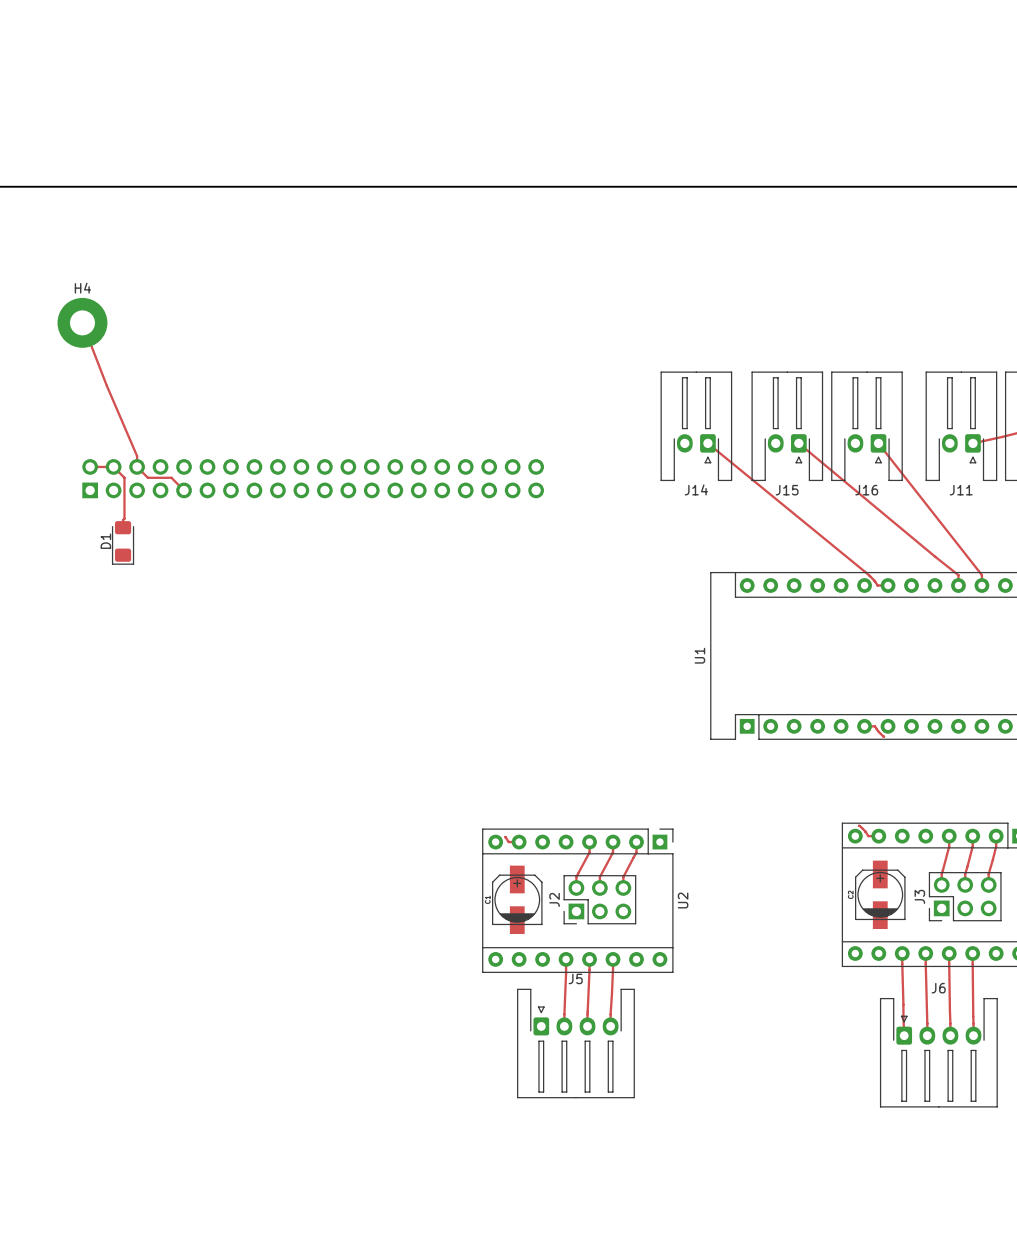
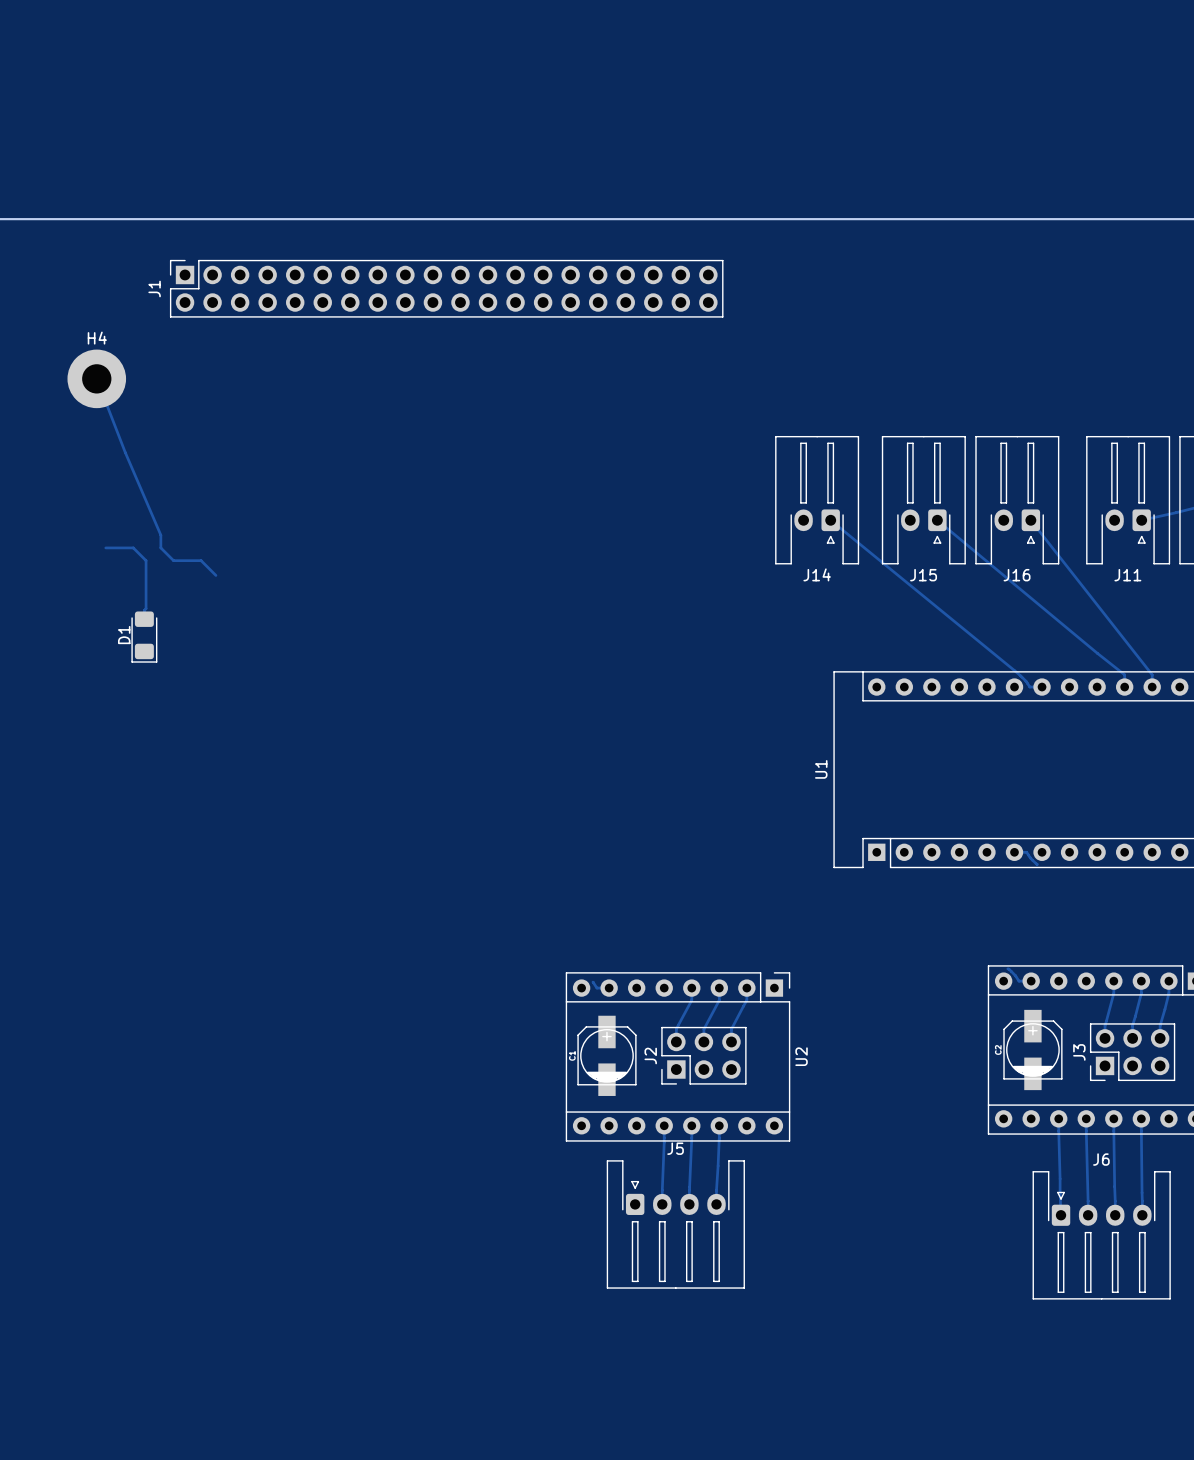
J1: none -> (446, 288)
part: (313, 478) -> none

